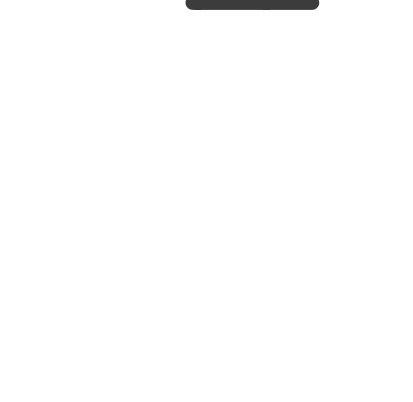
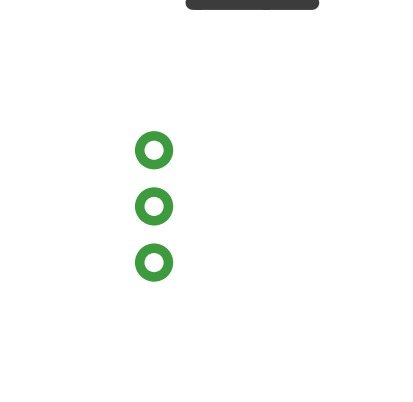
via: none -> (154, 150)
via: none -> (154, 206)
via: none -> (154, 262)

